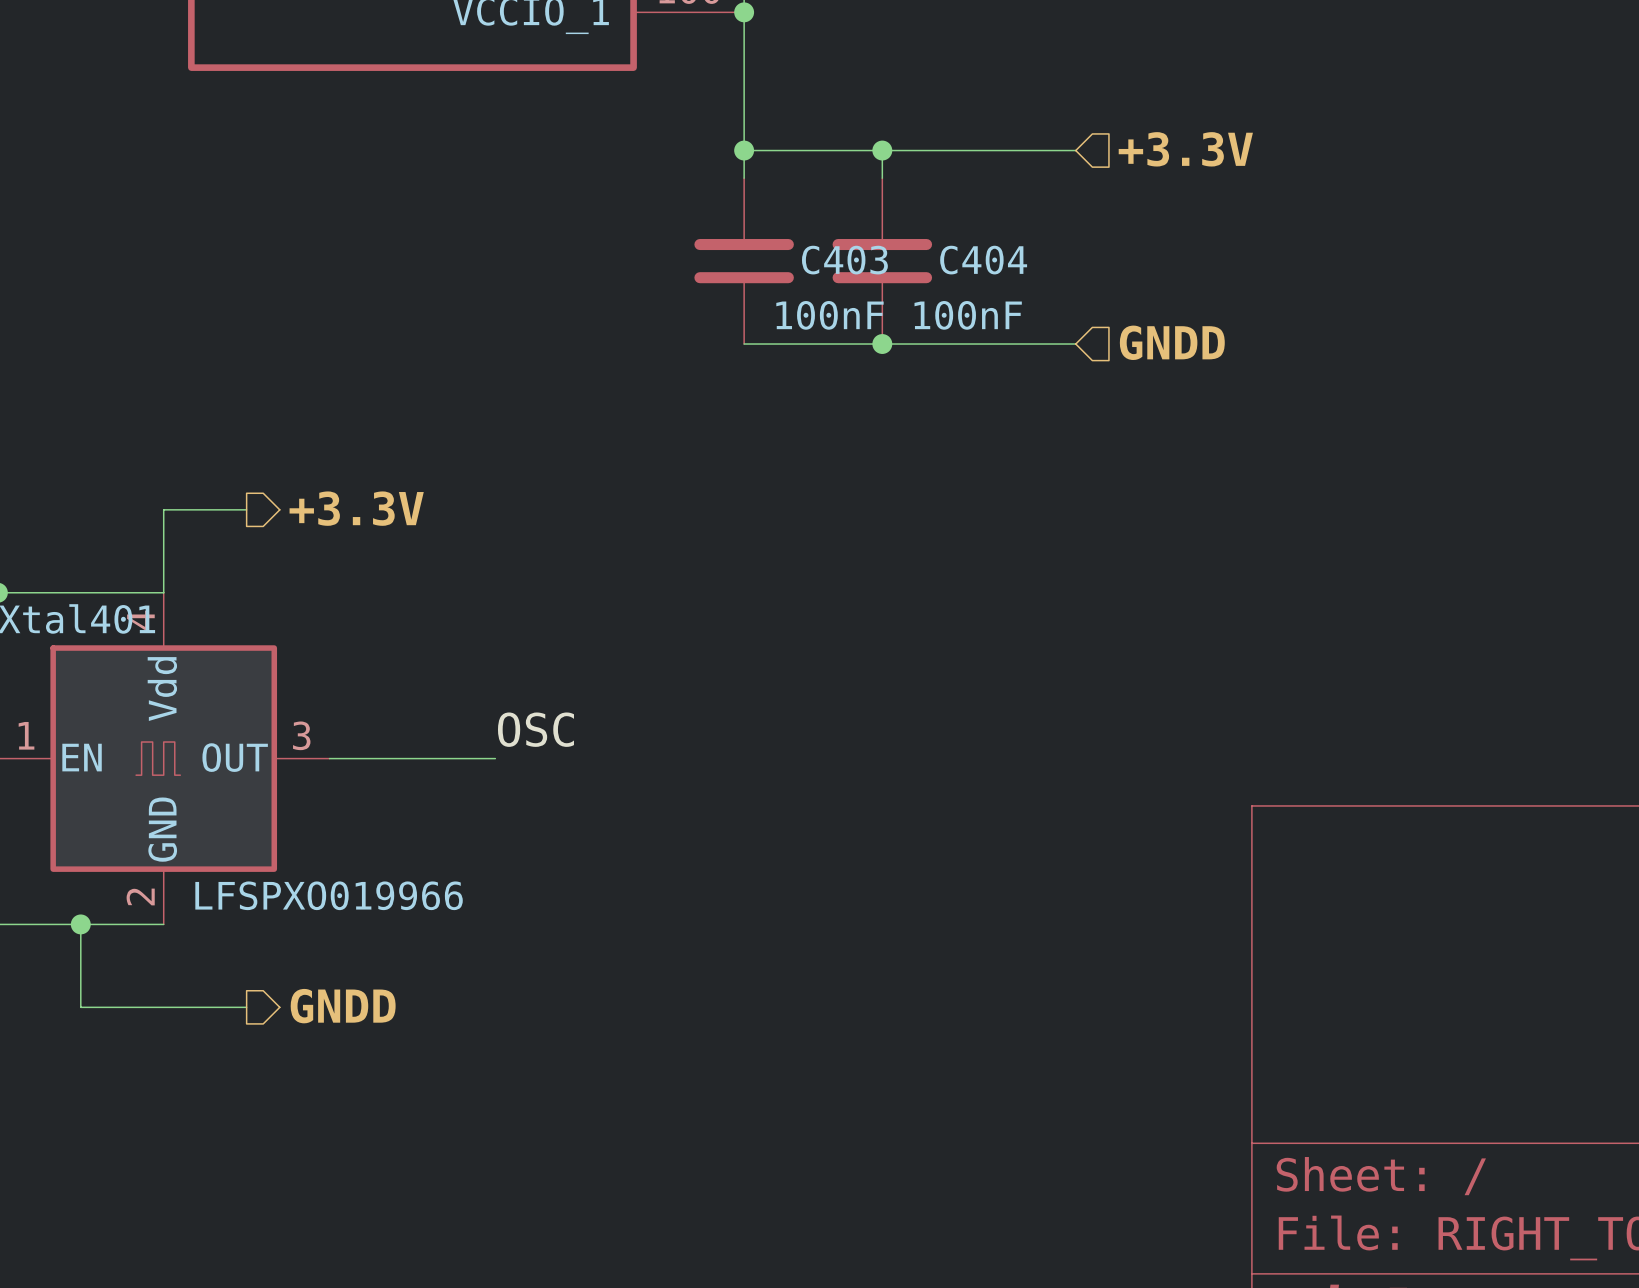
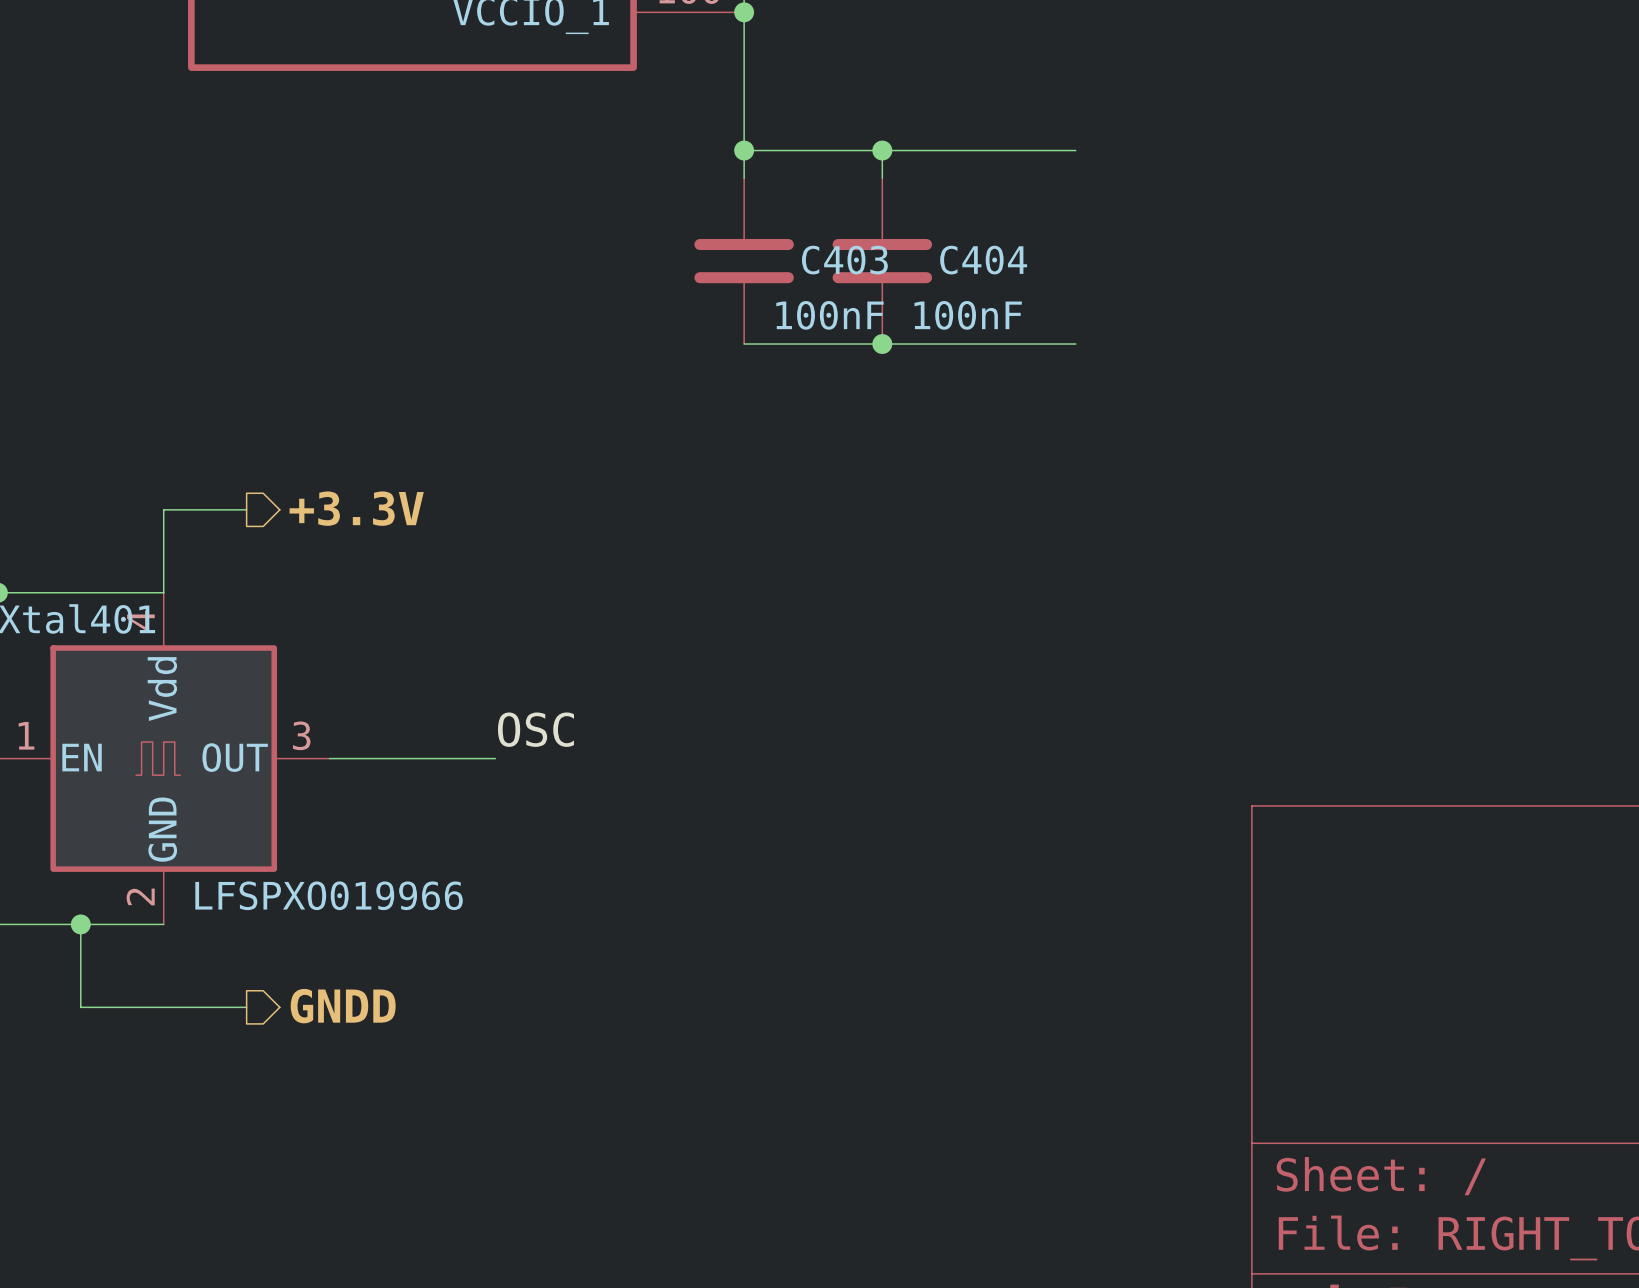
hierarchical label: +3.3V (1185, 149) -> none
hierarchical label: GNDD (1172, 342) -> none

